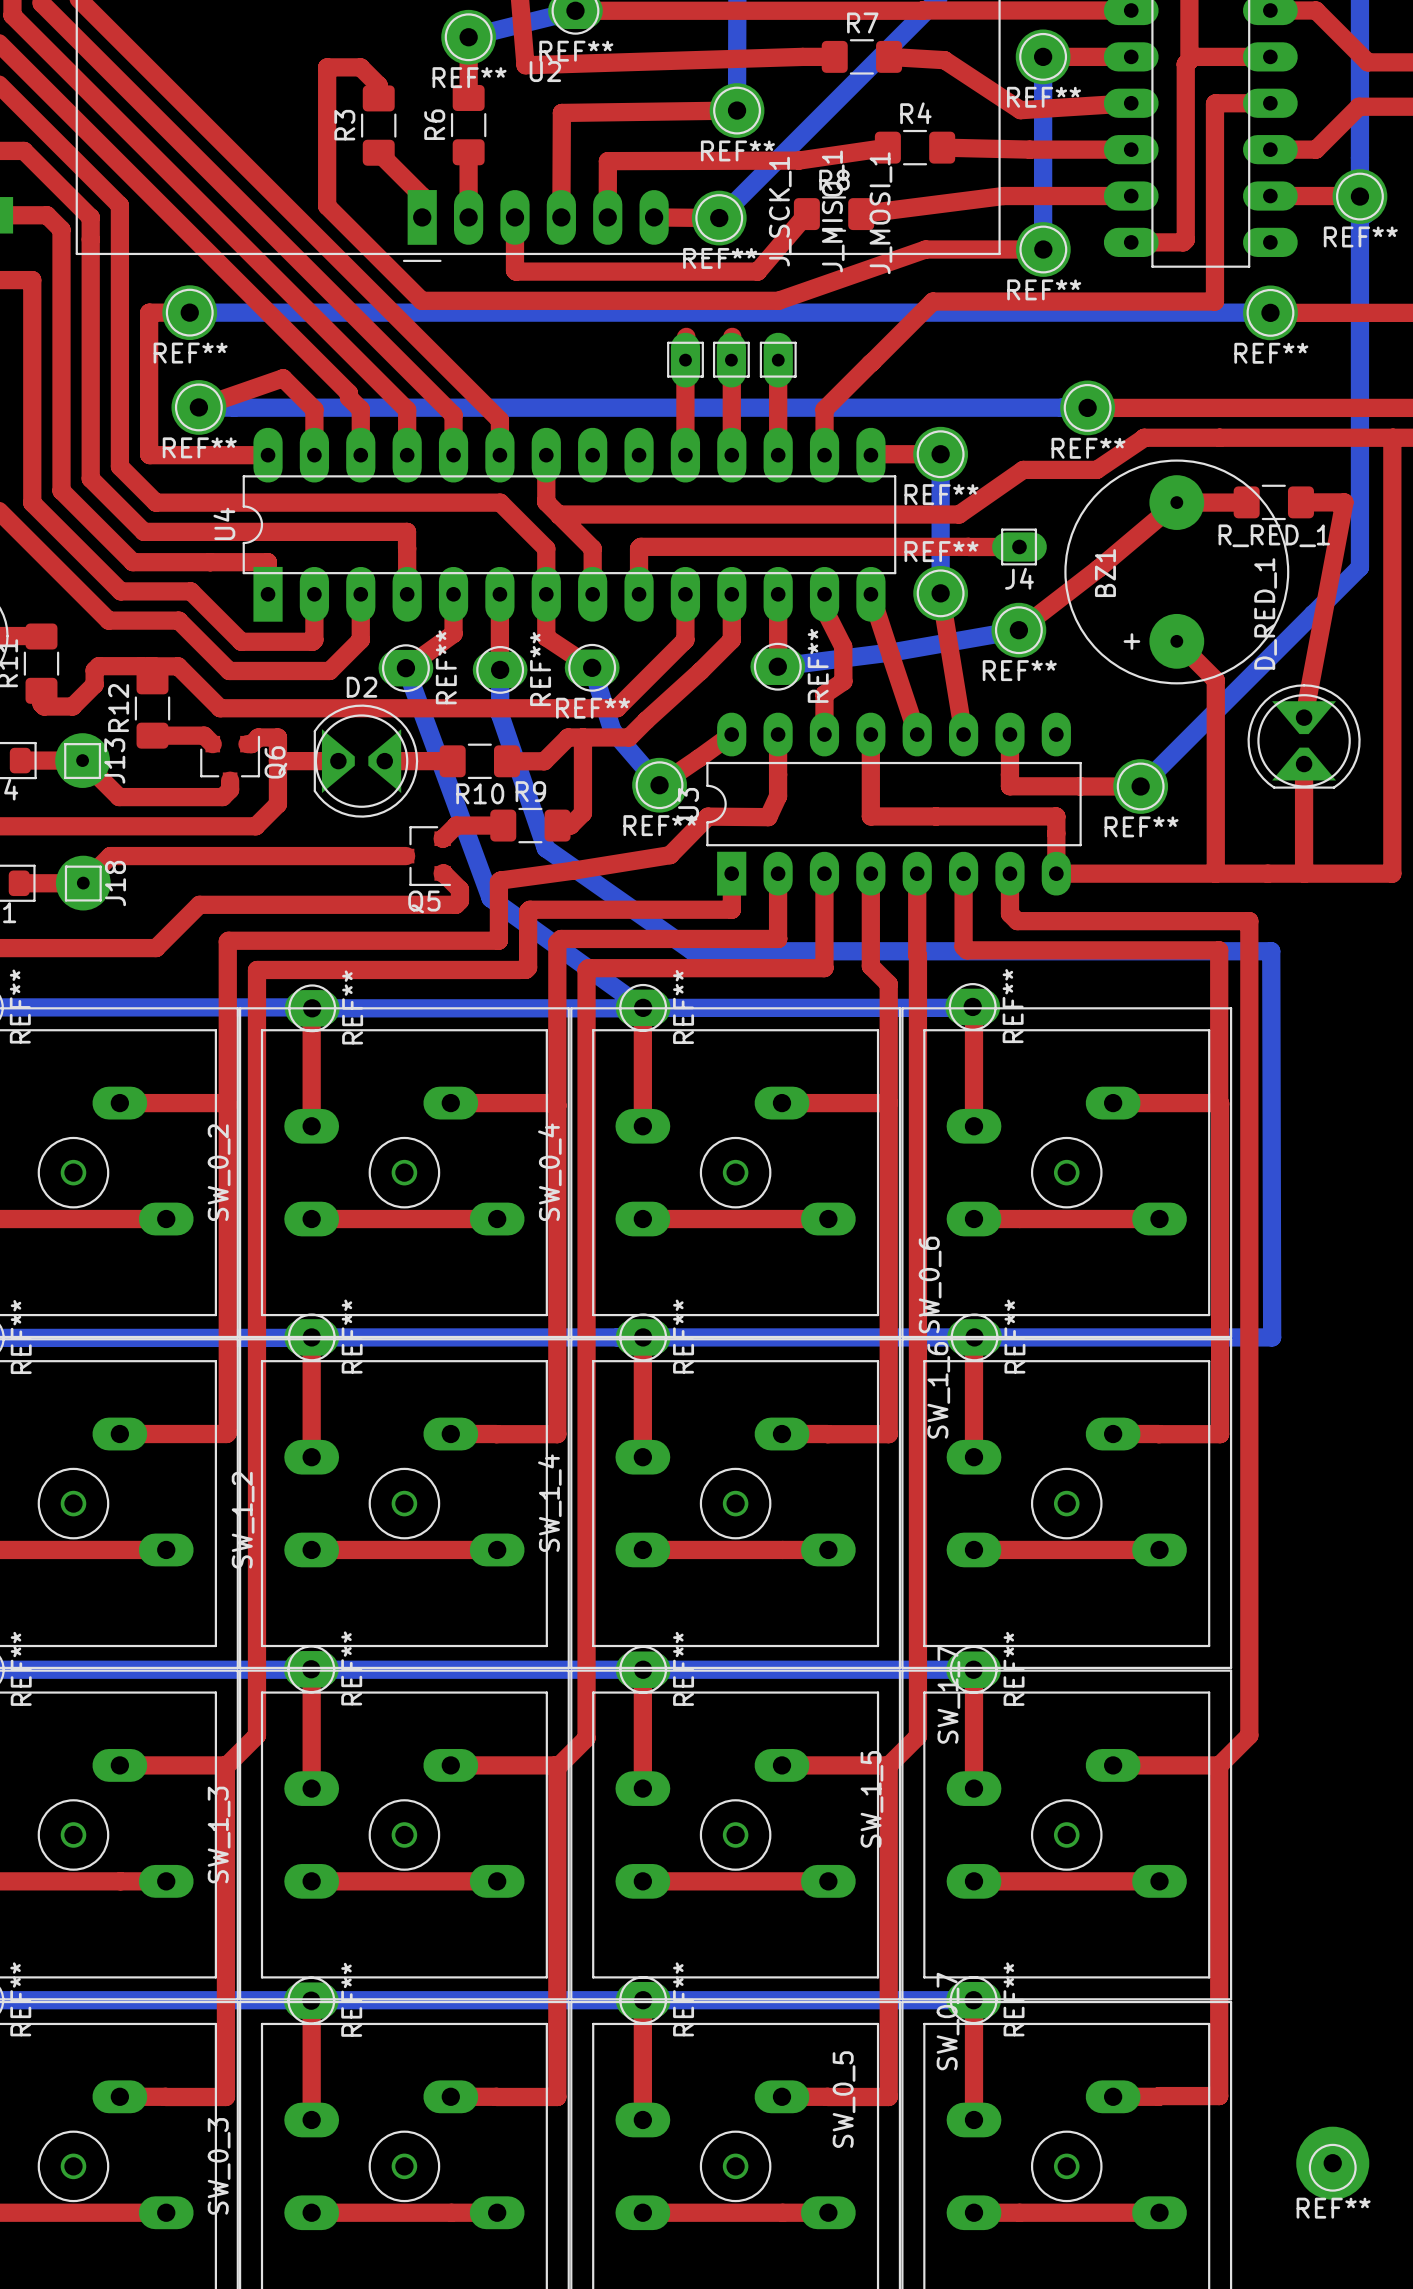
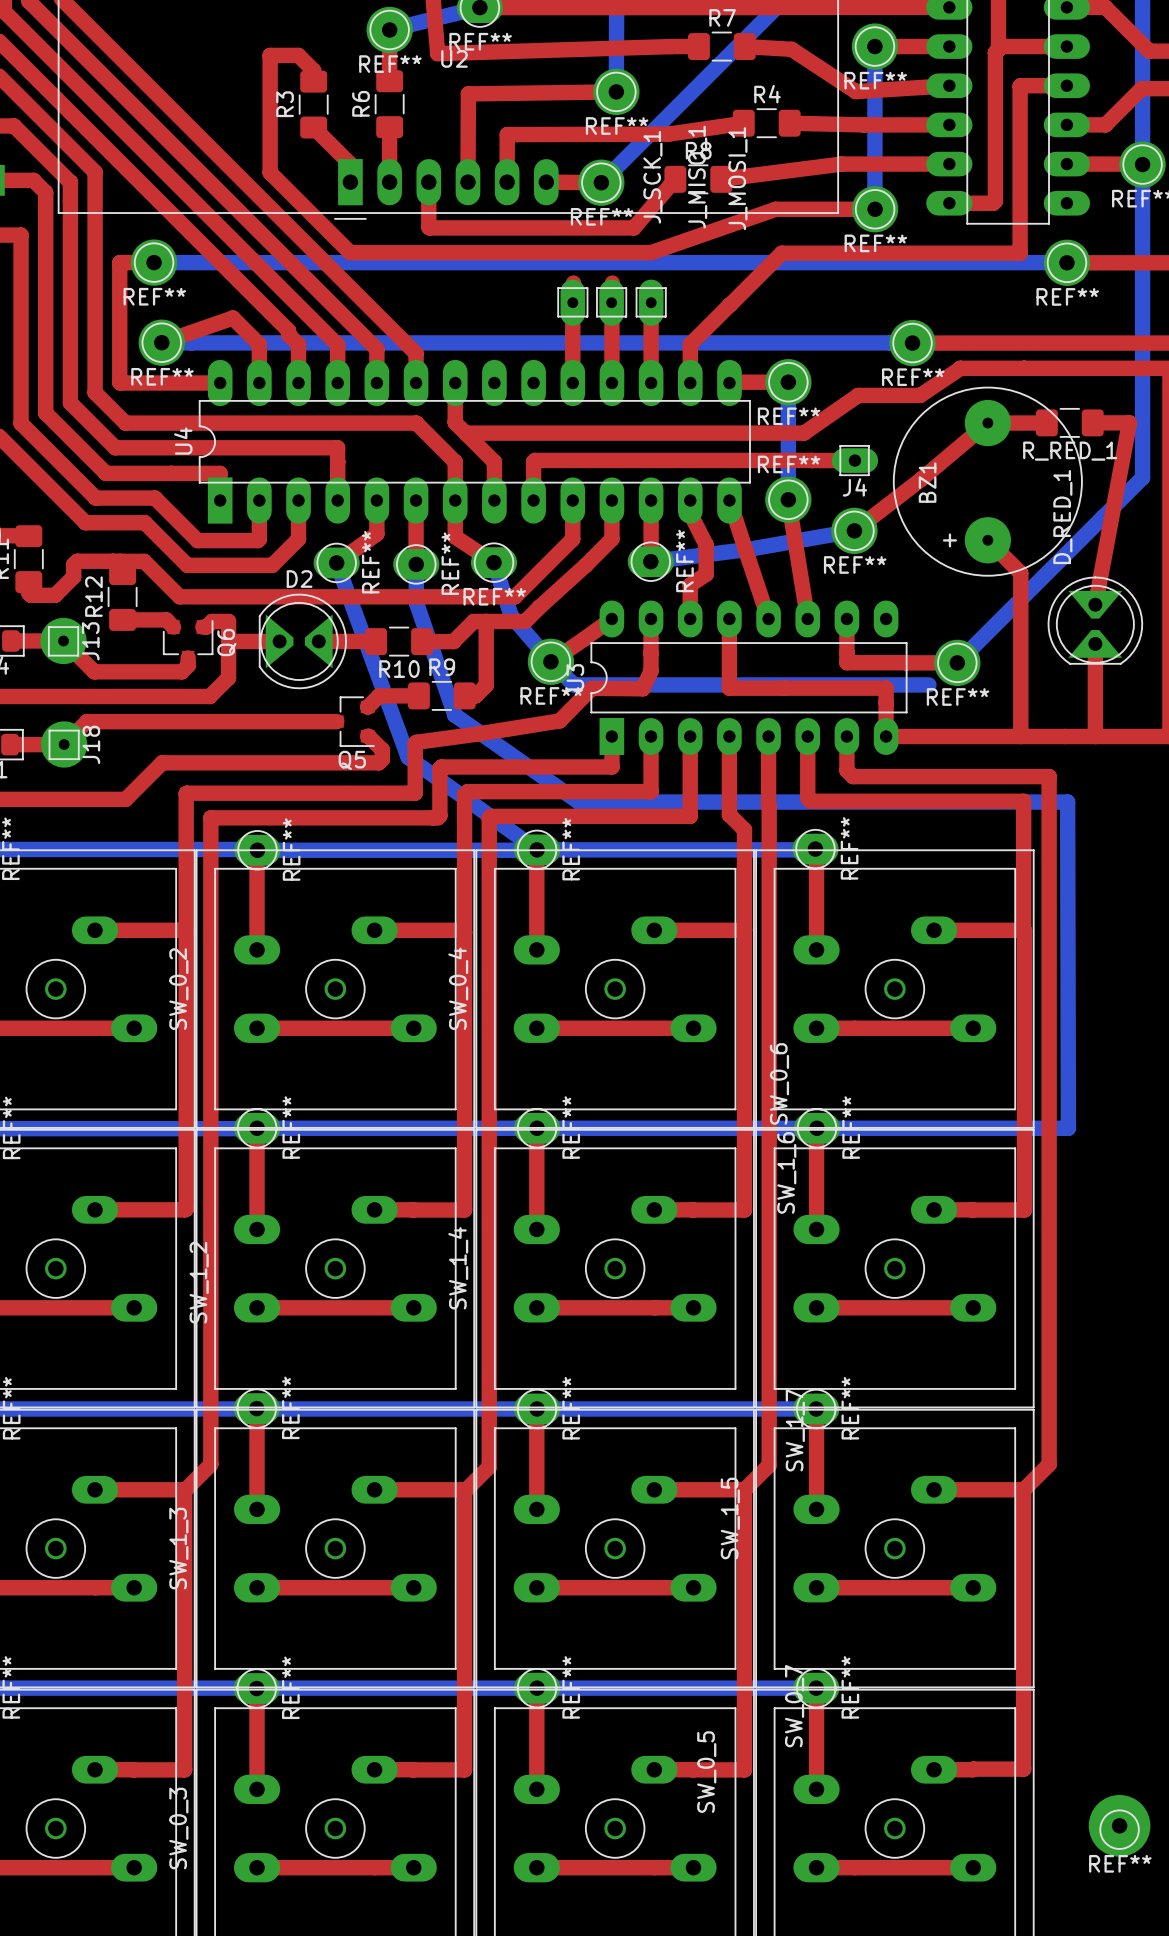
bottom track: none -> (550, 661) (574, 684) (928, 684)

